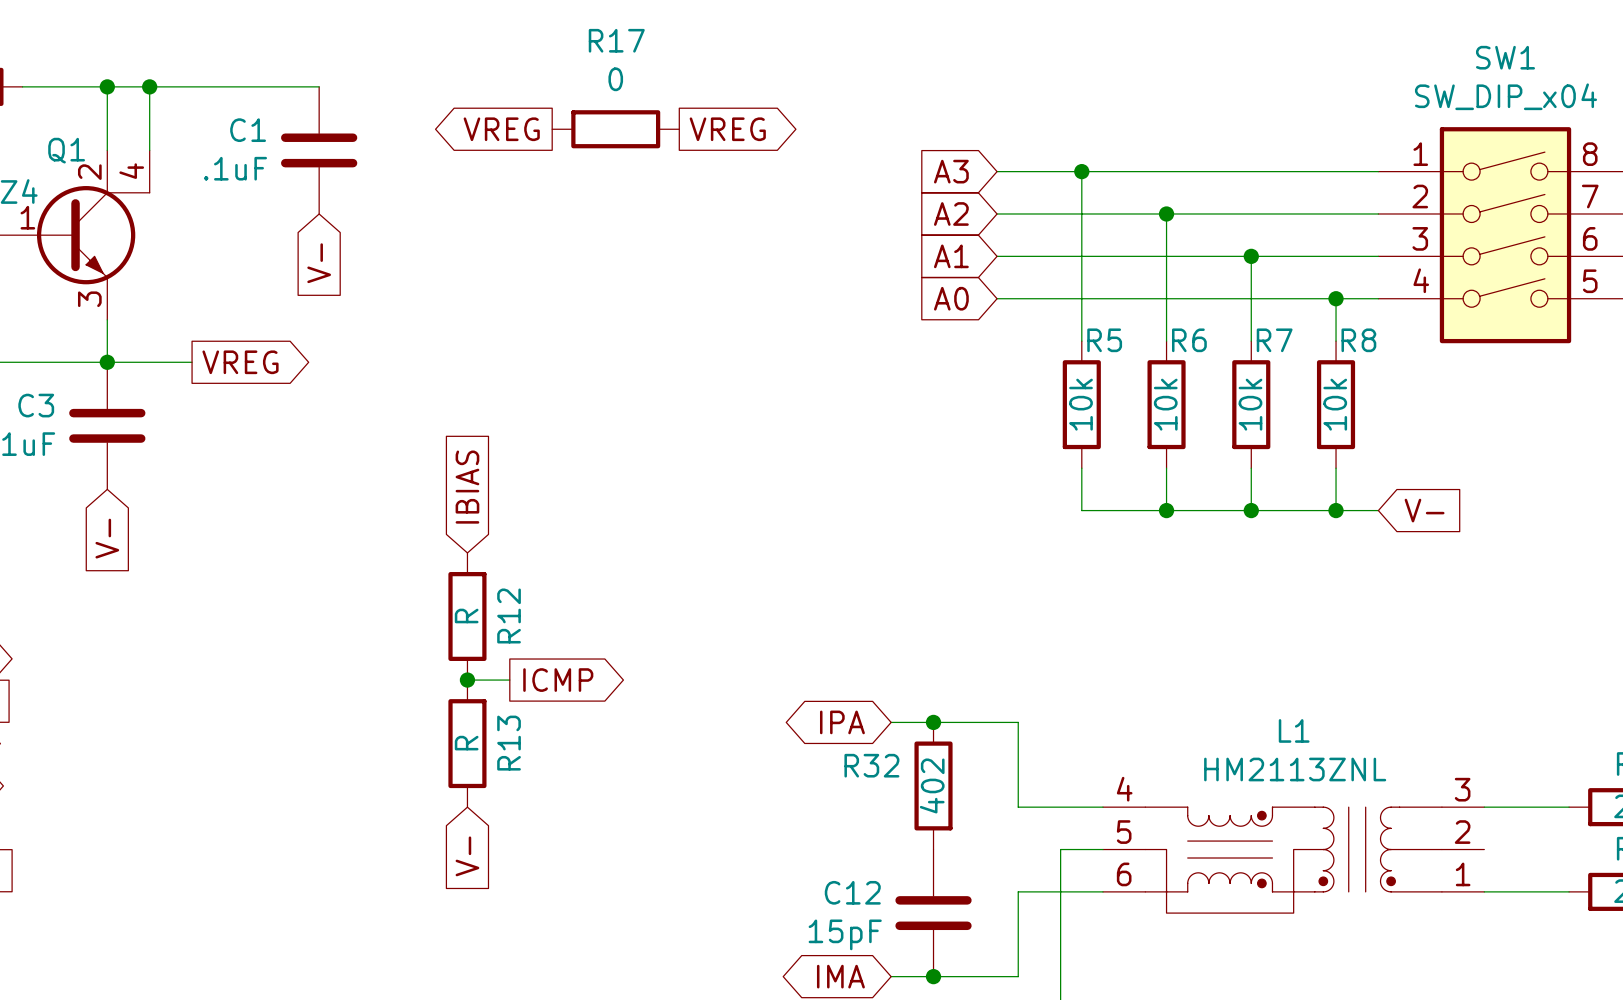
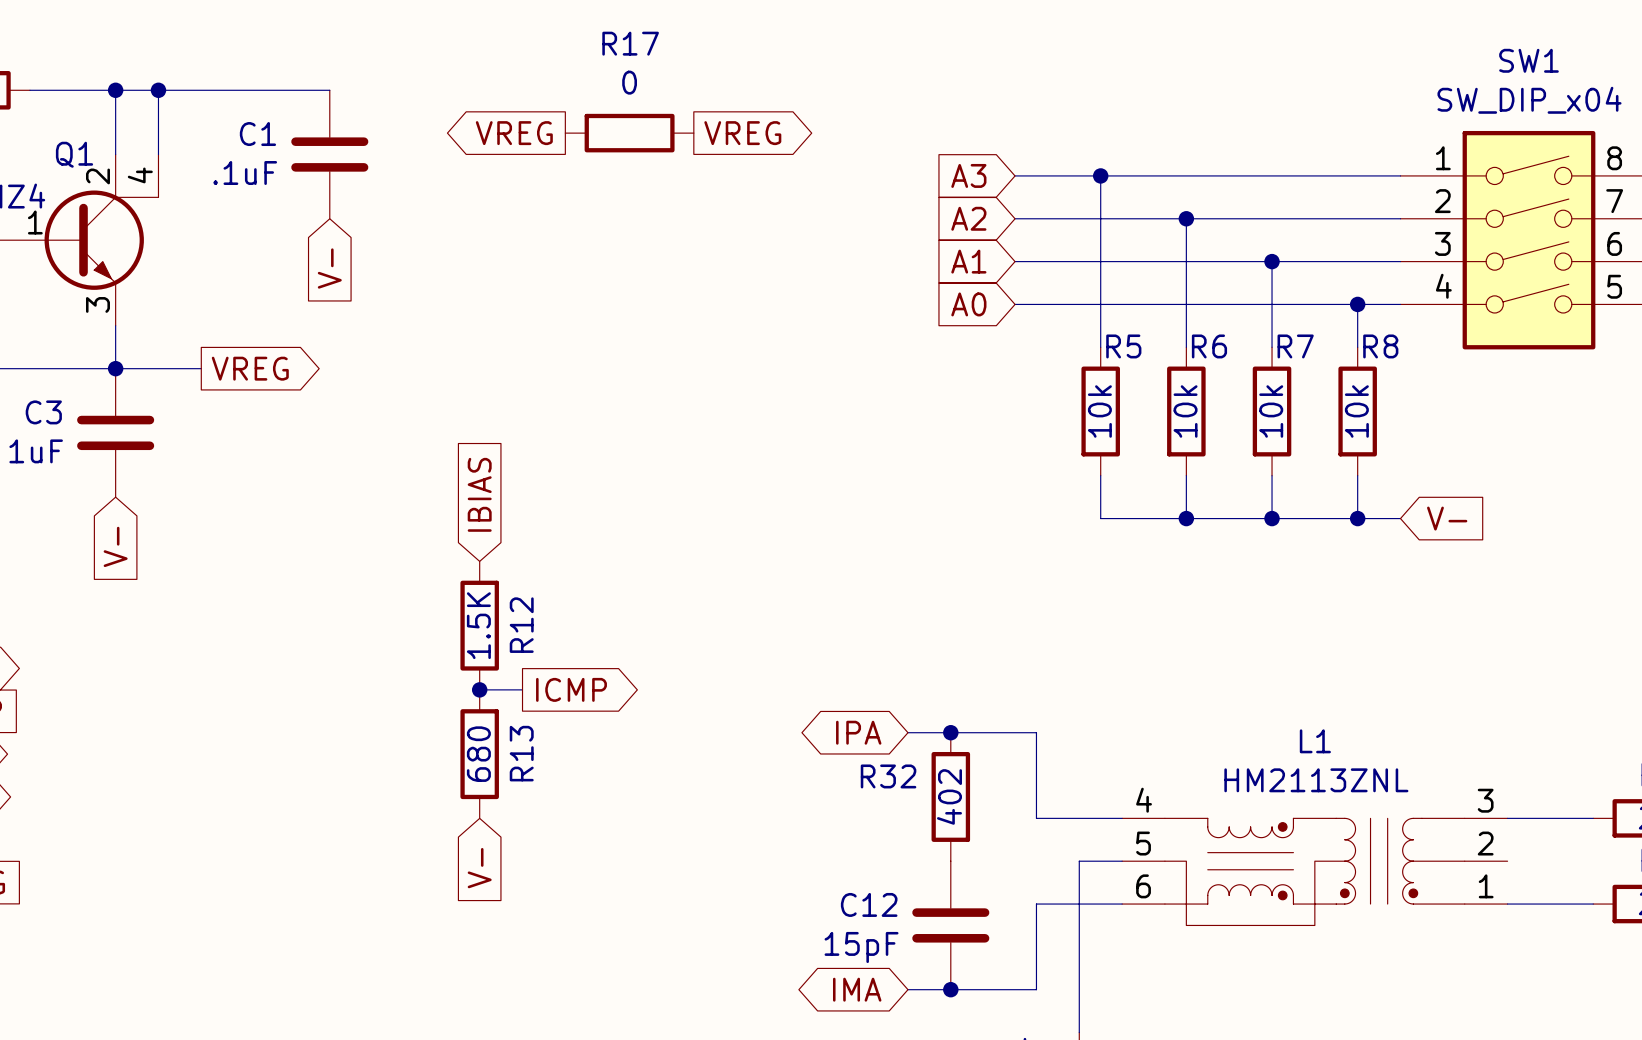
R12 value: R (466, 615) -> 1.5K (478, 625)
R13 value: R (466, 743) -> 680 (478, 754)

